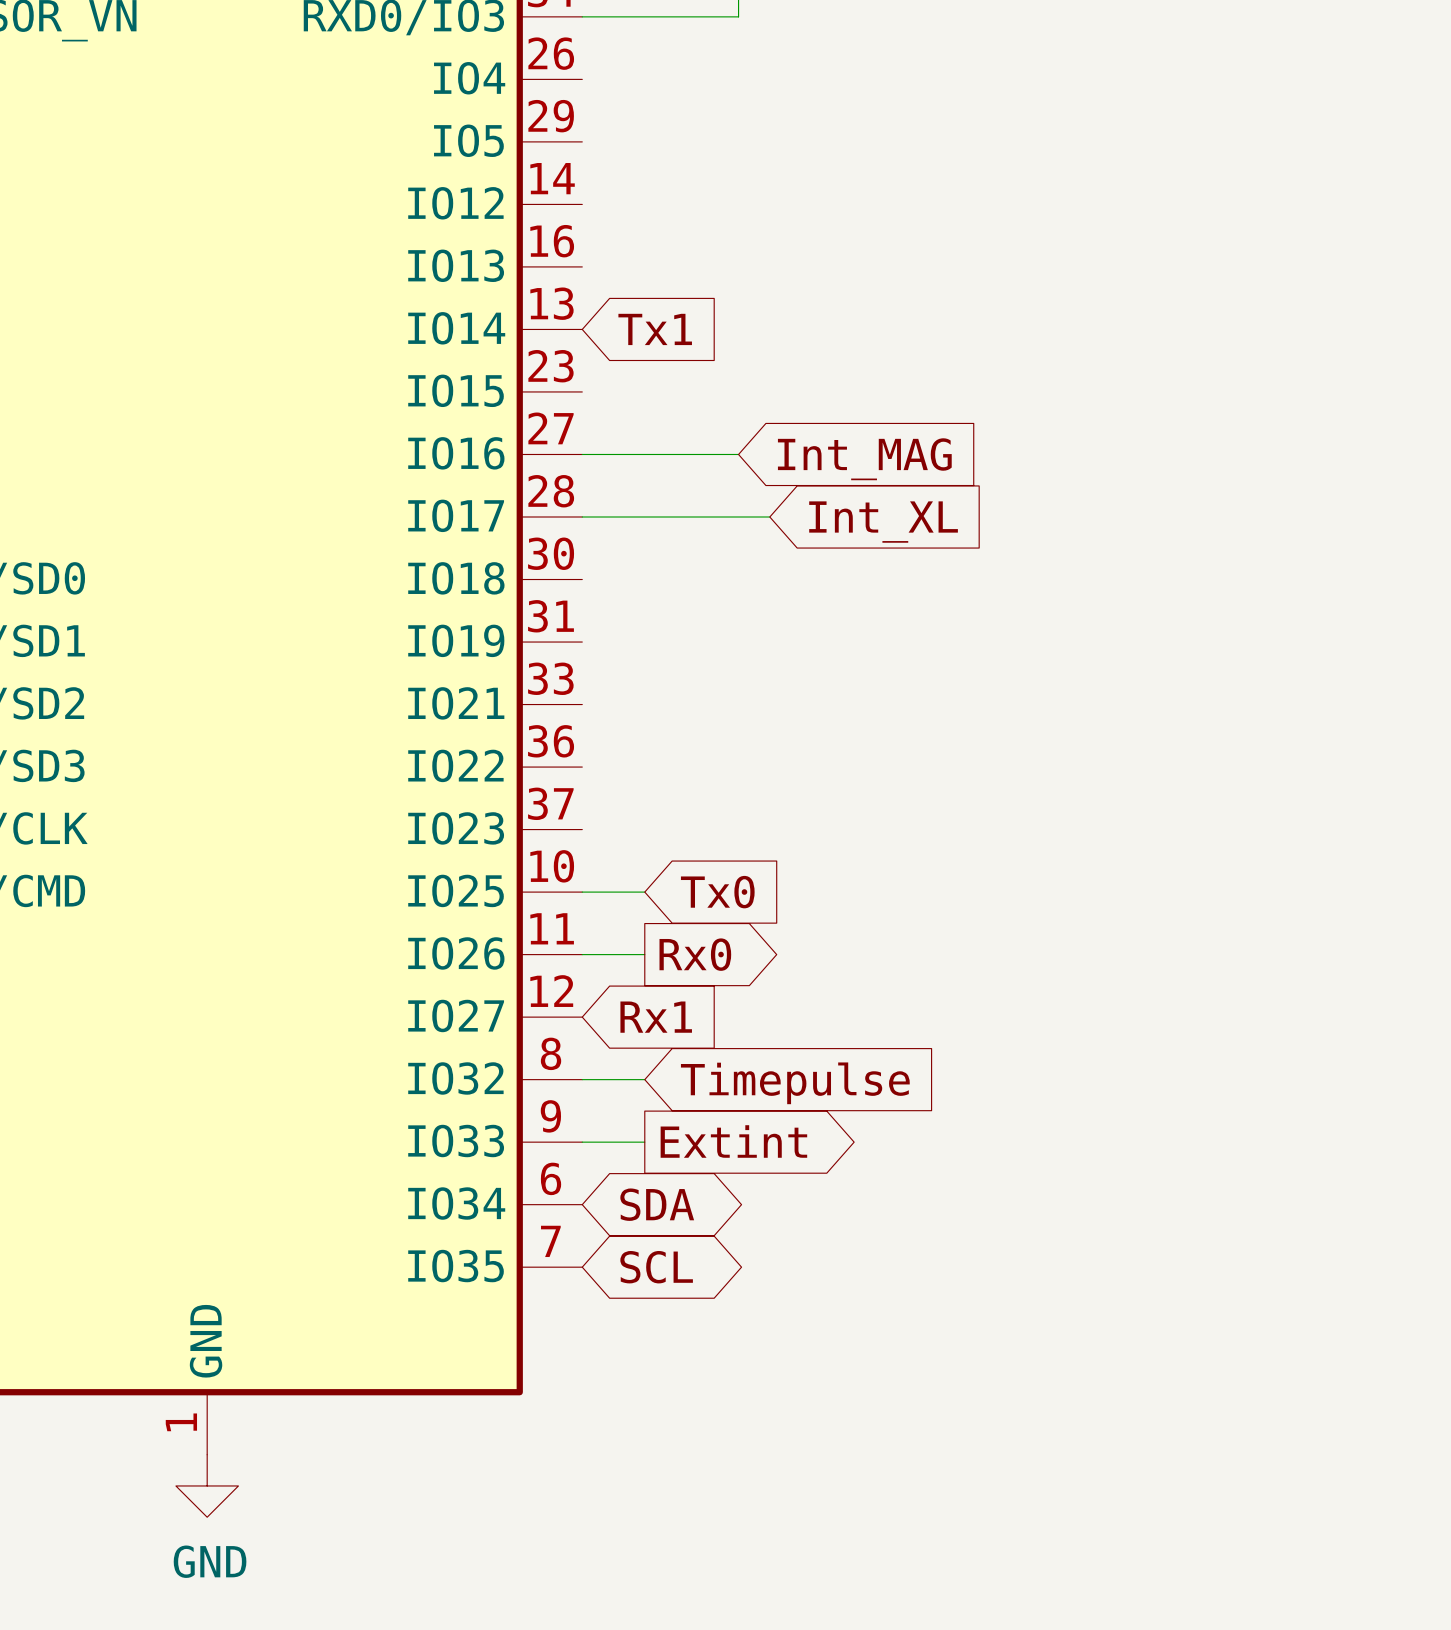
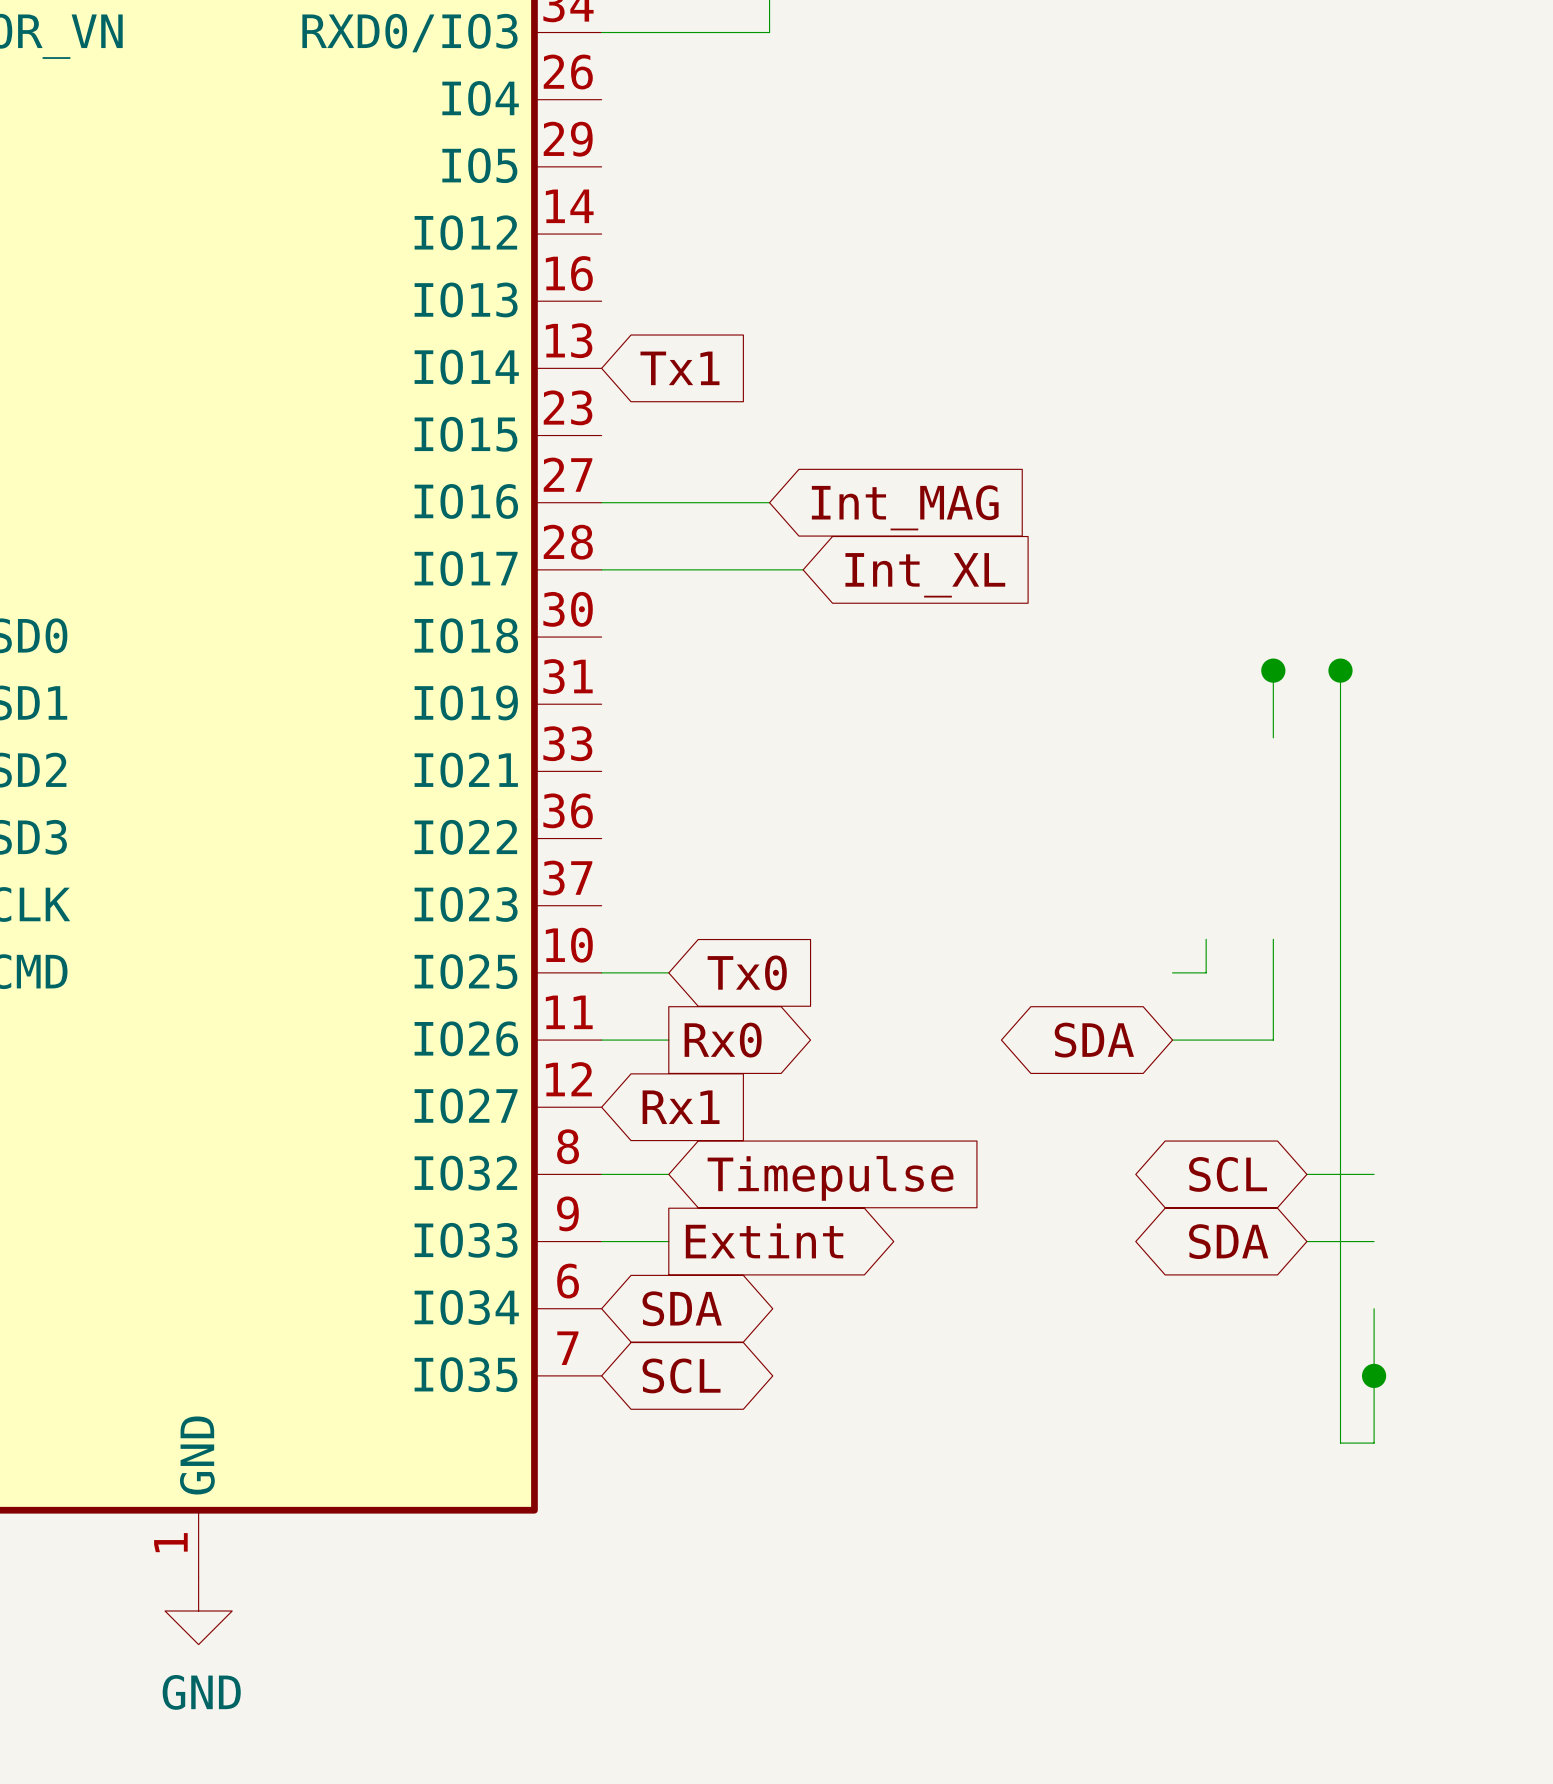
wire: none -> (1273, 670) (1273, 737)
junction: none -> (1273, 670)
wire: none -> (1340, 670) (1340, 1443) (1374, 1443) (1374, 1308)
junction: none -> (1340, 670)
wire: none -> (1206, 939) (1206, 972) (1172, 972)
wire: none -> (1273, 939) (1273, 1040) (1172, 1040)
global label: none -> SDA (1094, 1040)
global label: none -> SCL (1228, 1174)
wire: none -> (1306, 1174) (1374, 1174)
global label: none -> SDA (1228, 1241)
wire: none -> (1306, 1241) (1374, 1241)
junction: none -> (1374, 1375)

